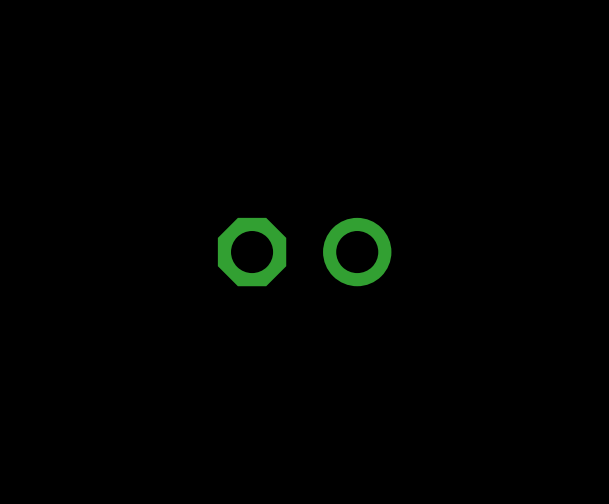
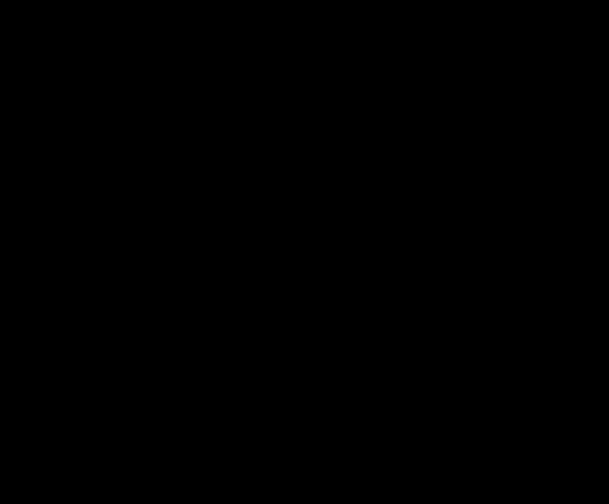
part: (304, 252) -> none

